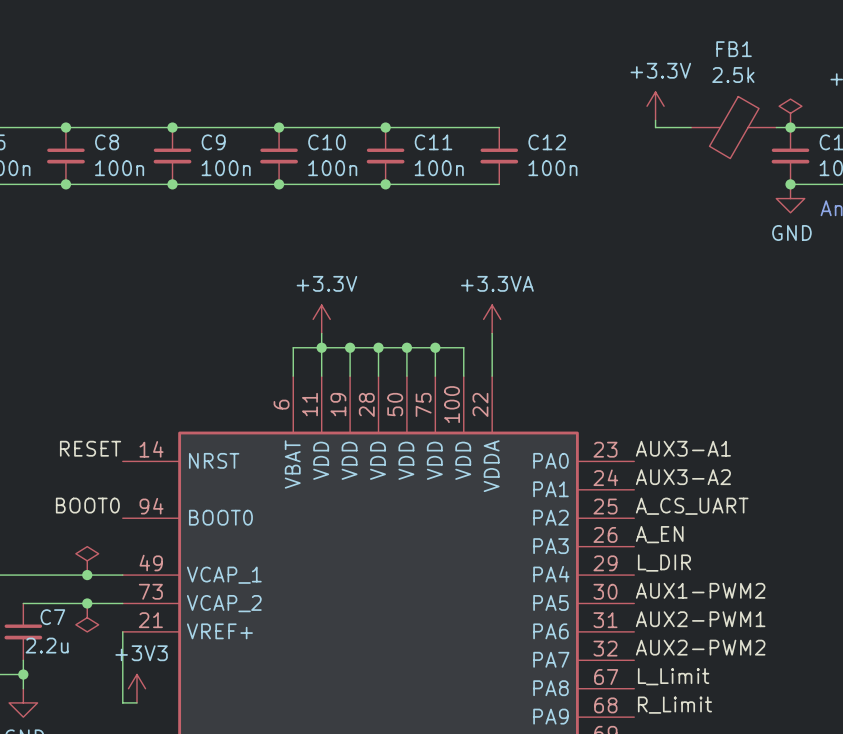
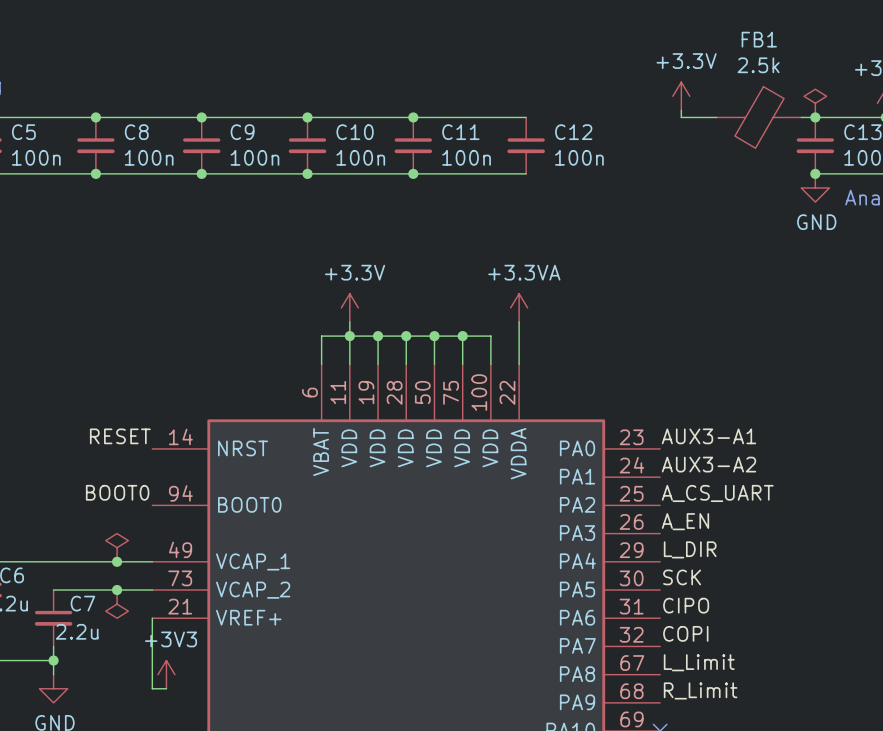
label: AUX1-PWM2 (700, 590) -> SCK (682, 577)
label: AUX2-PWM1 (700, 619) -> CIPO (686, 605)
label: AUX2-PWM2 (700, 647) -> COPI (685, 633)

